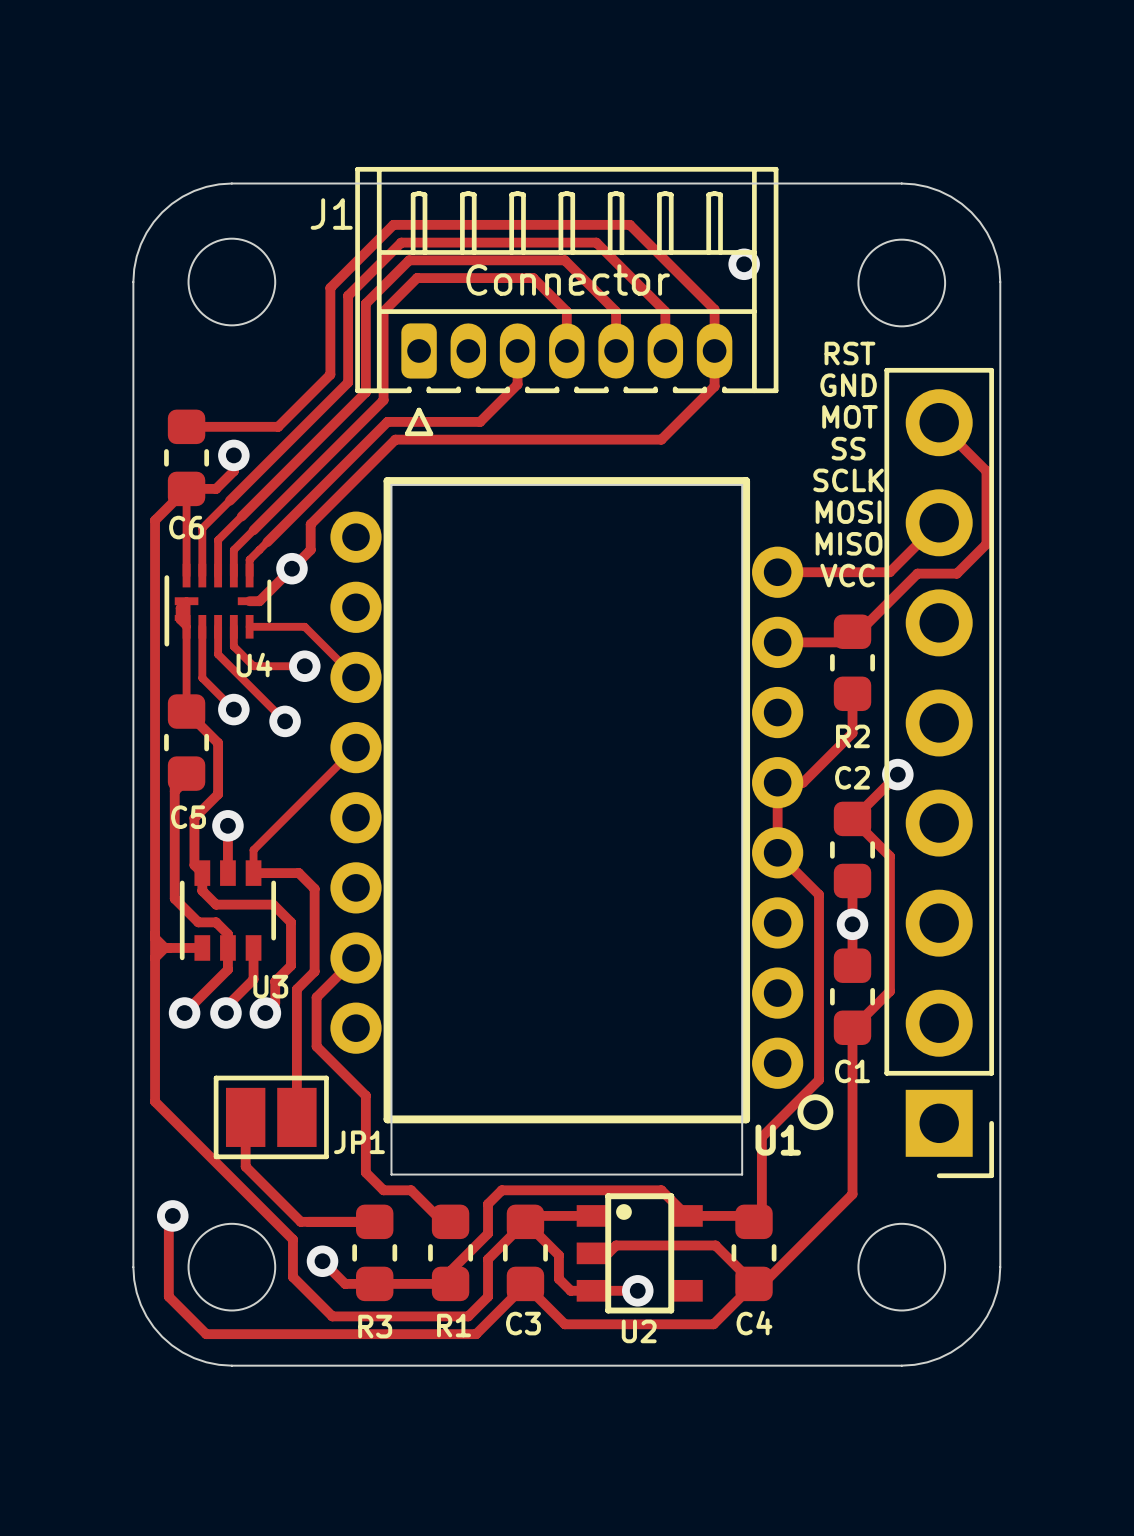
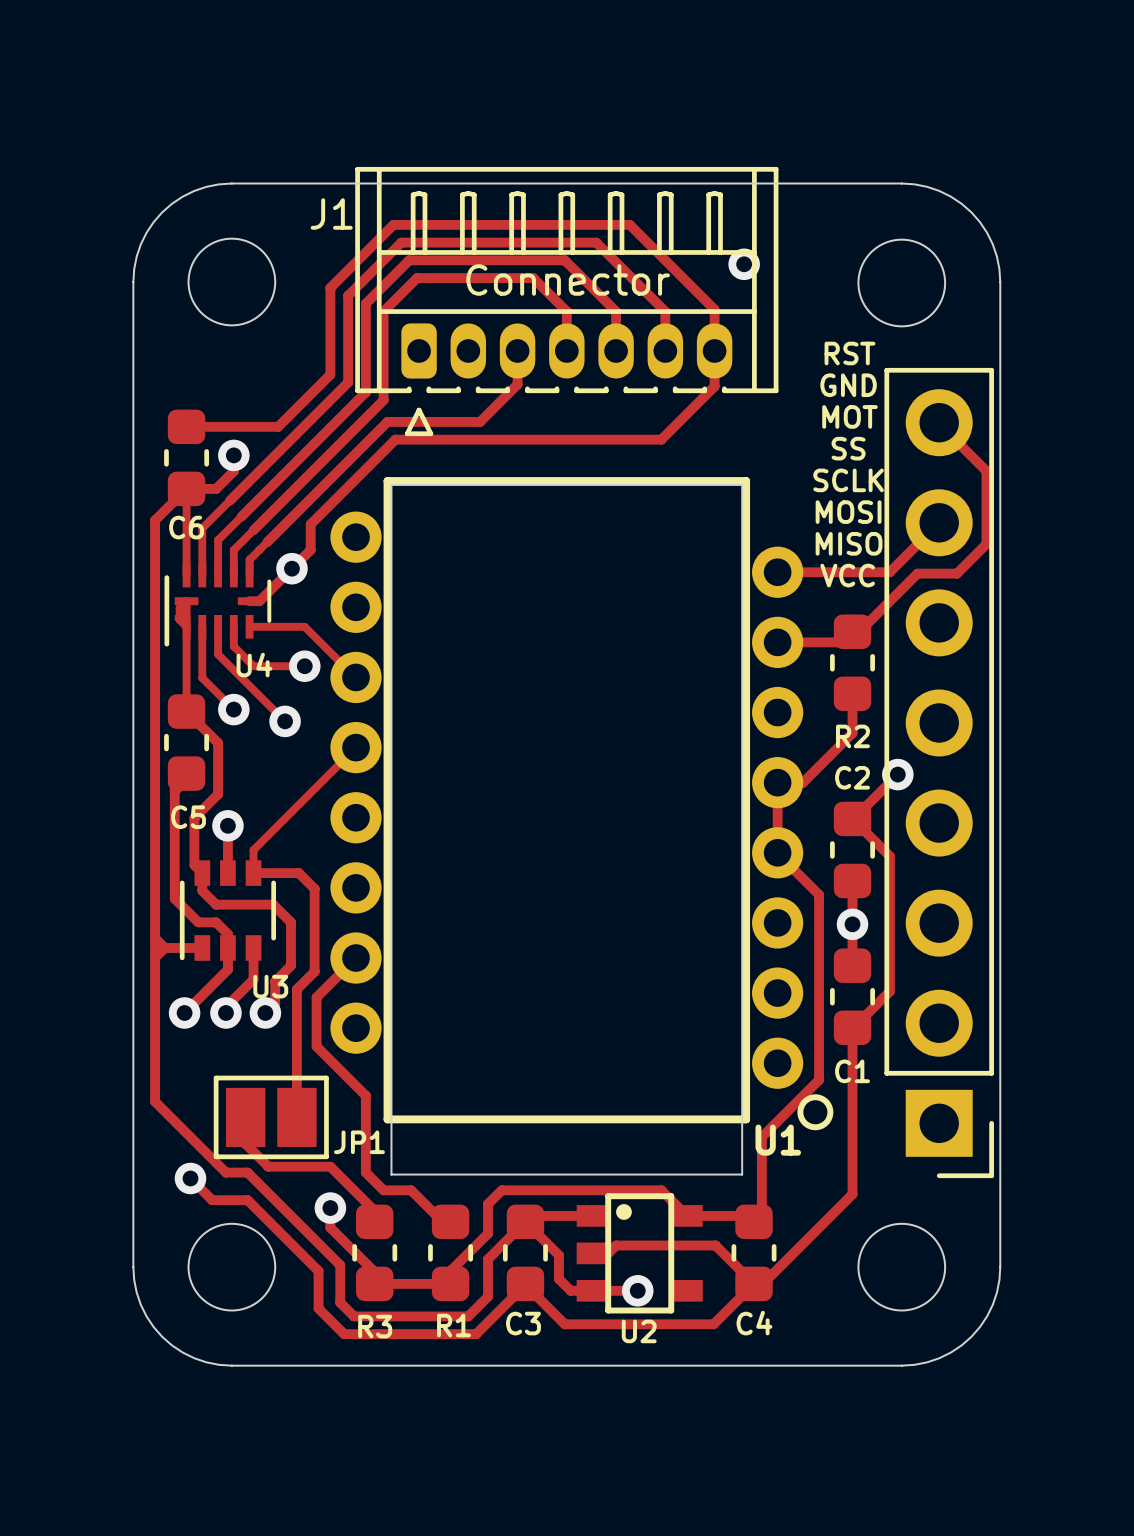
track: (245, 1144) (245, 1166) (300, 1221) (374, 1221) -> (245, 1144) (268, 1166) (330, 1166) (374, 1211) (374, 1221)
track: (225, 1172) (292, 1239) (292, 1277) (332, 1316) (354, 1316) -> (225, 1172) (247, 1172) (340, 1265) (340, 1302) (354, 1316)
track: (172, 1215) (168, 1219) (168, 1296) (206, 1334) (344, 1334) -> (190, 1178) (212, 1200) (247, 1200) (318, 1271) (318, 1308) (344, 1334)
via position: (172, 1215) -> (190, 1178)
track: (322, 1261) (345, 1283) (374, 1283) -> (330, 1208) (330, 1227) (374, 1272) (374, 1283)
via position: (322, 1261) -> (330, 1208)

